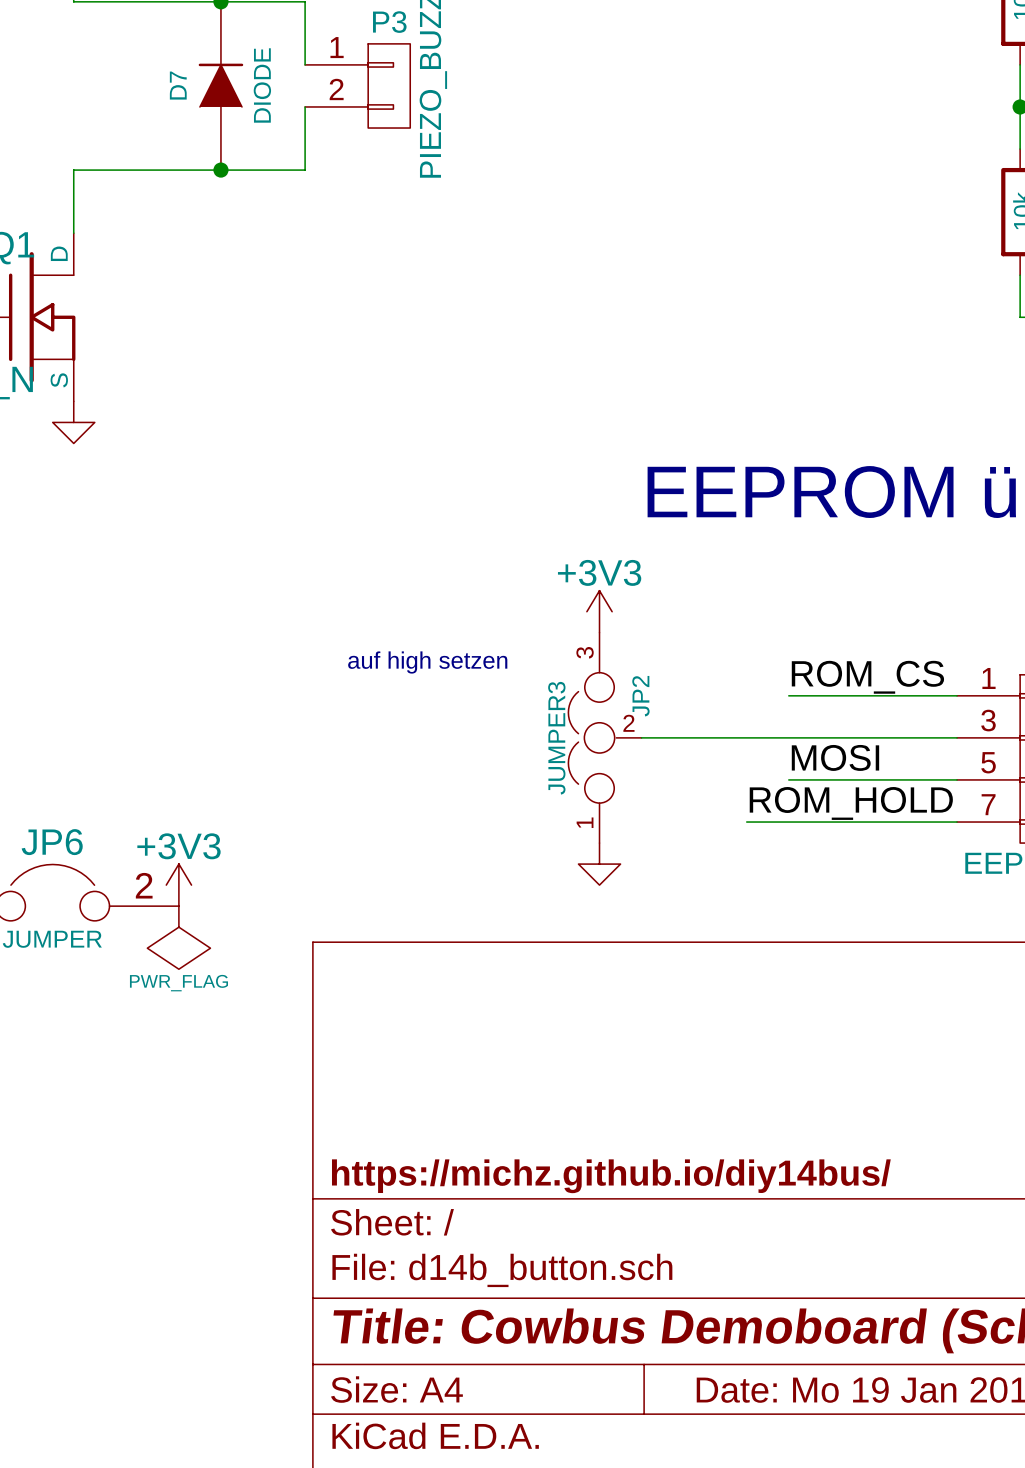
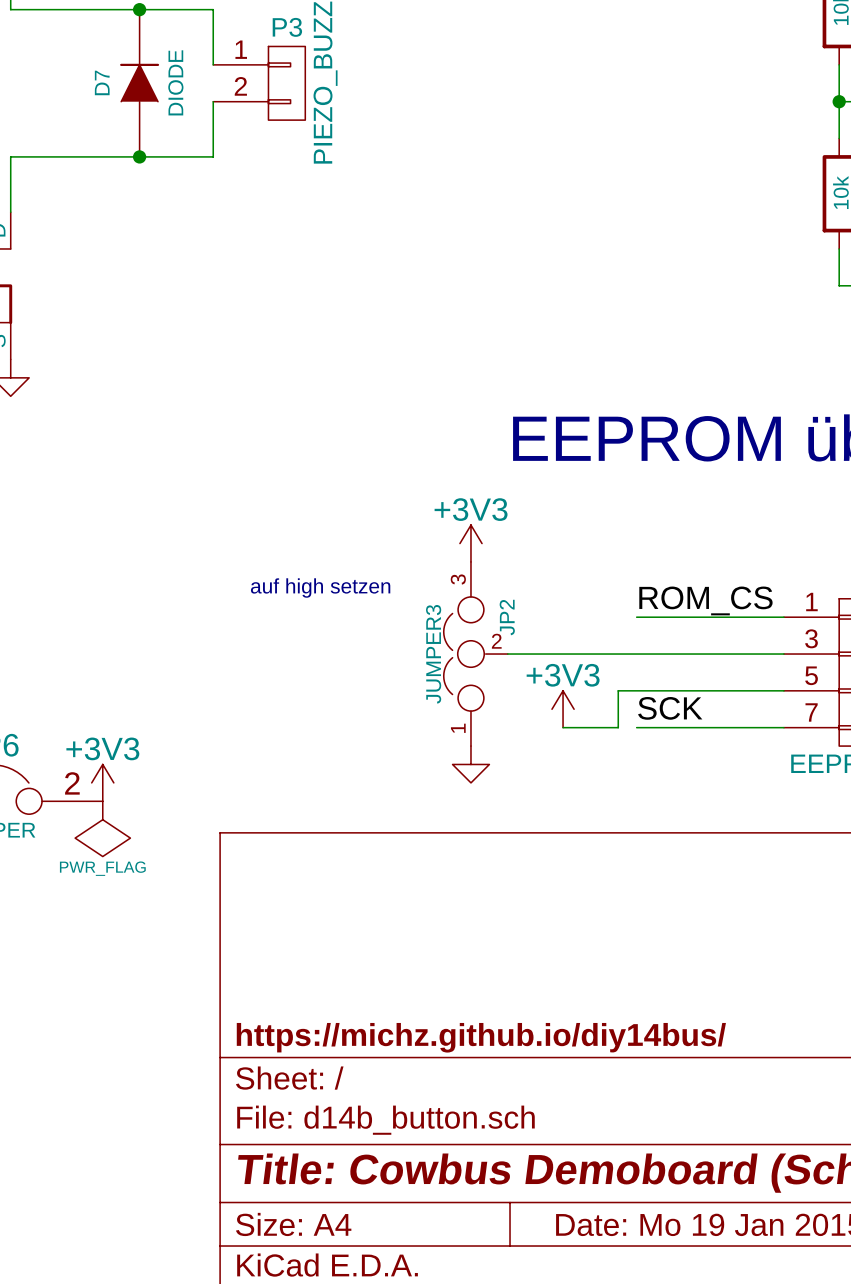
label: MOSI (835, 757) -> none
label: none -> SCK (670, 708)
power symbol: none -> +3V3 (563, 709)
label: ROM_HOLD (851, 803) -> none
wire: none -> (563, 727) (599, 727)
wire: (767, 822) (788, 822) -> (618, 727) (618, 690) (636, 690)

